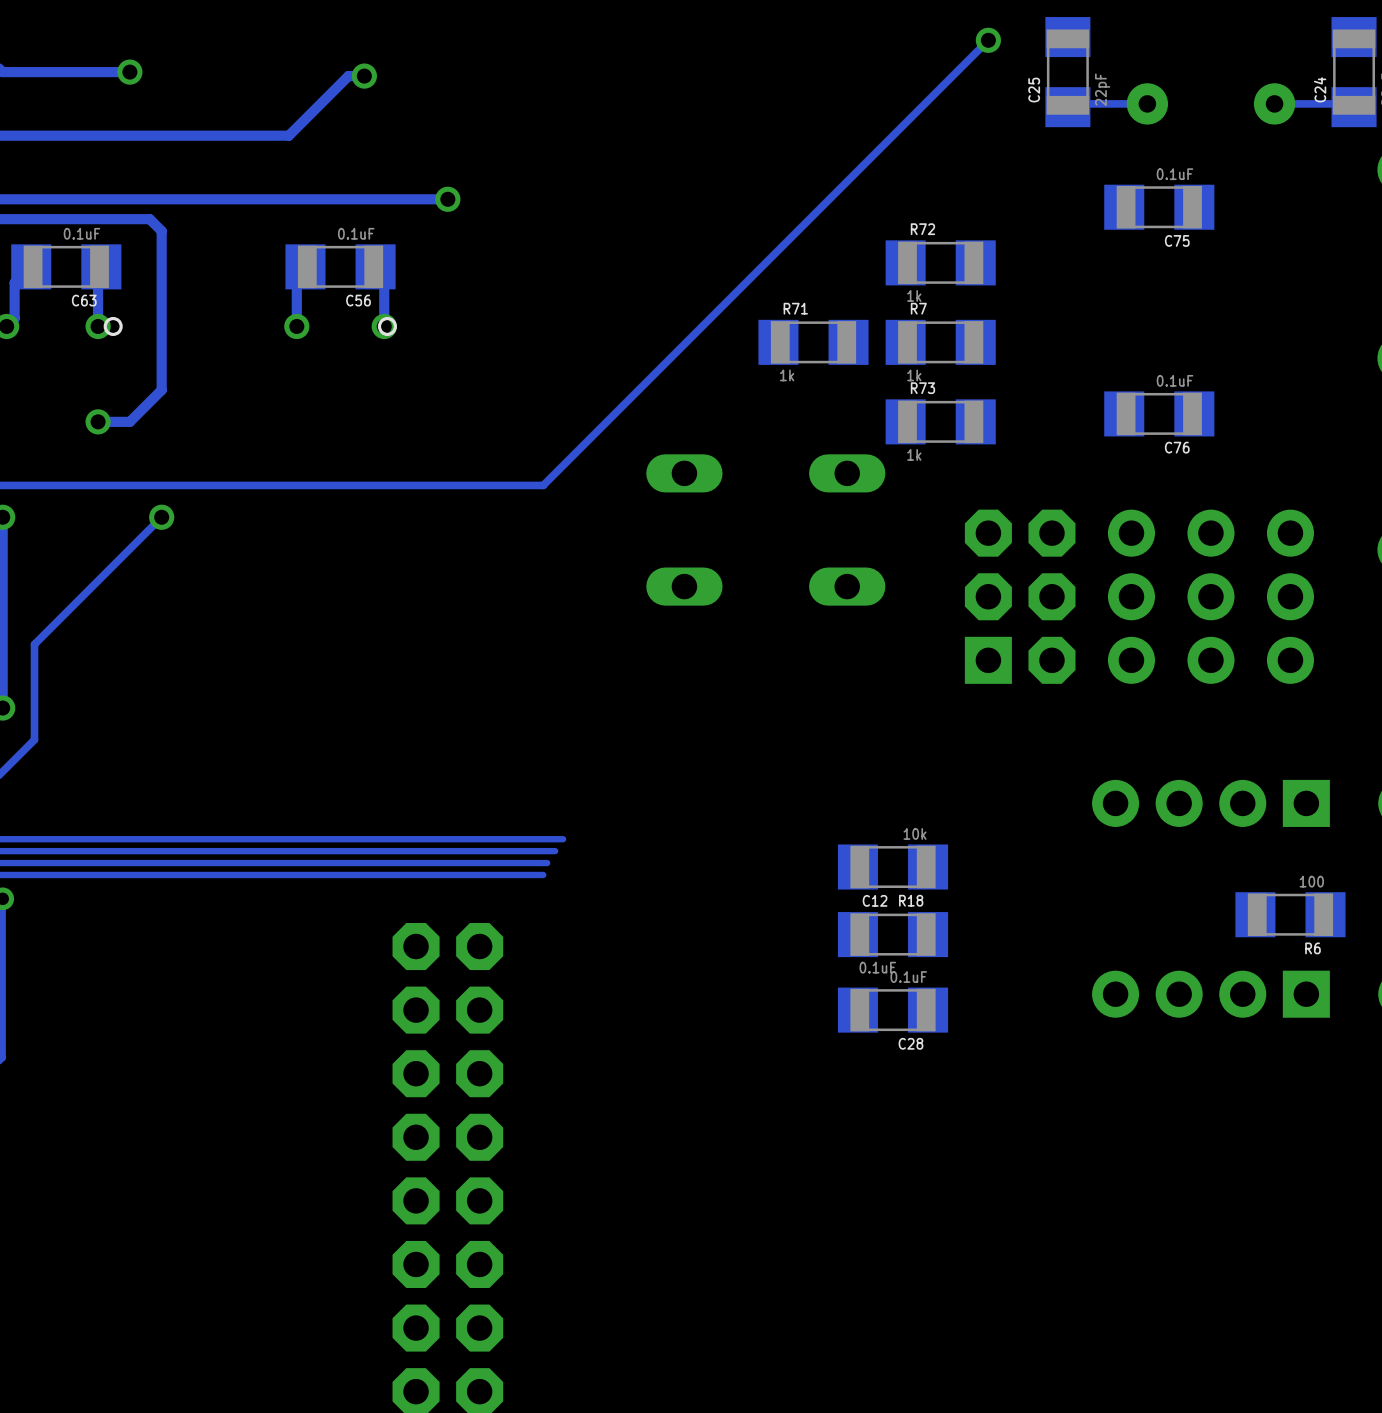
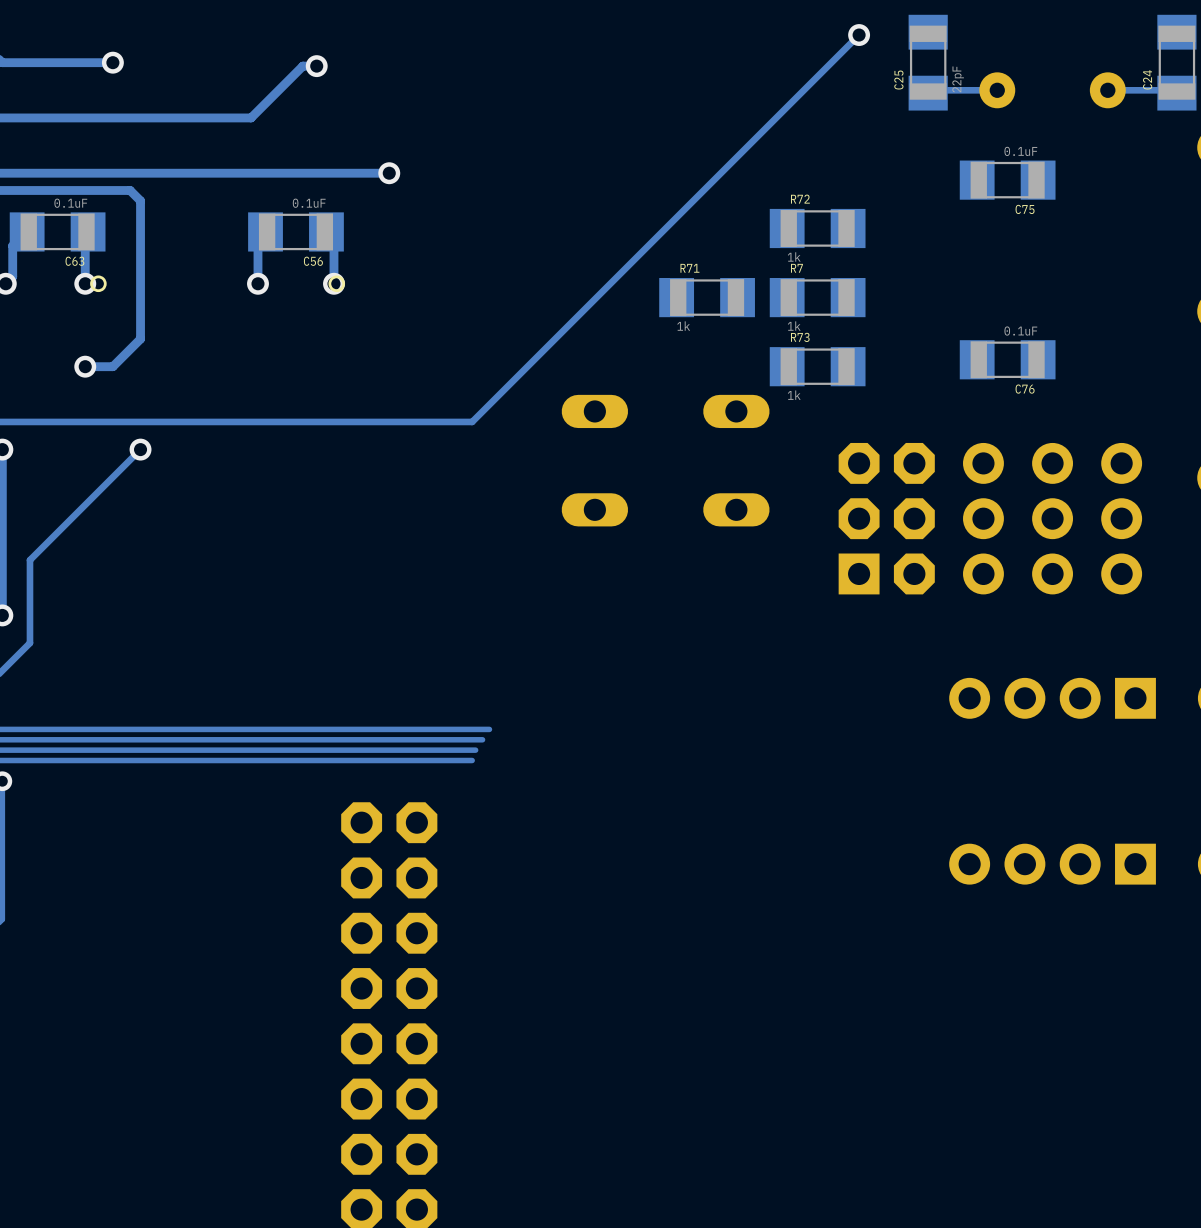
R18: 10k (893, 867) -> none
R6: 100 (1290, 914) -> none
C12: 0.1uF (893, 934) -> none
C28: 0.1uF (893, 1010) -> none

